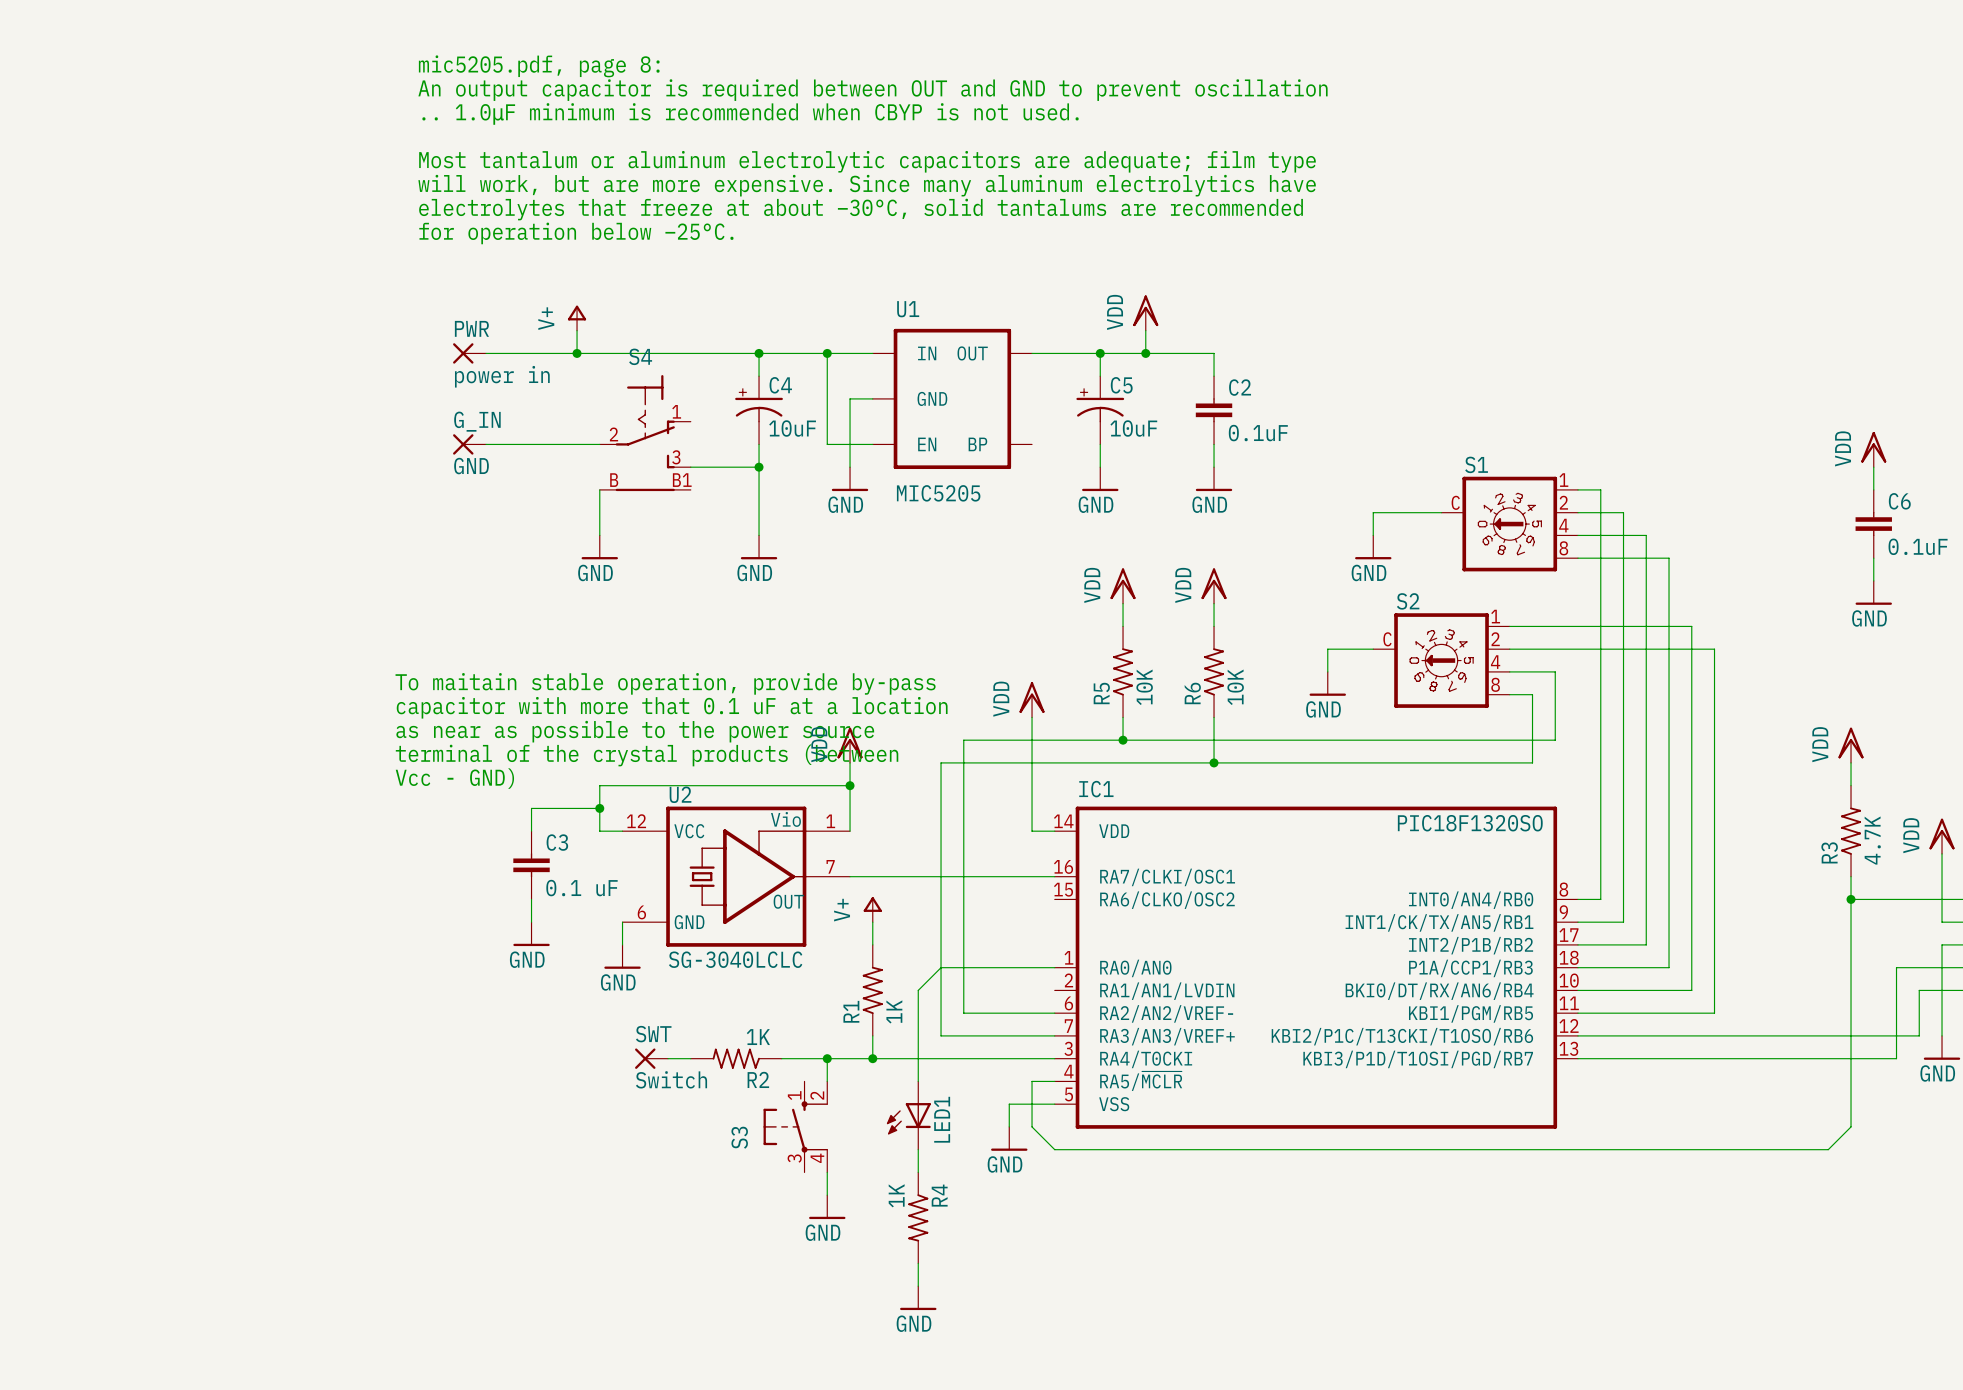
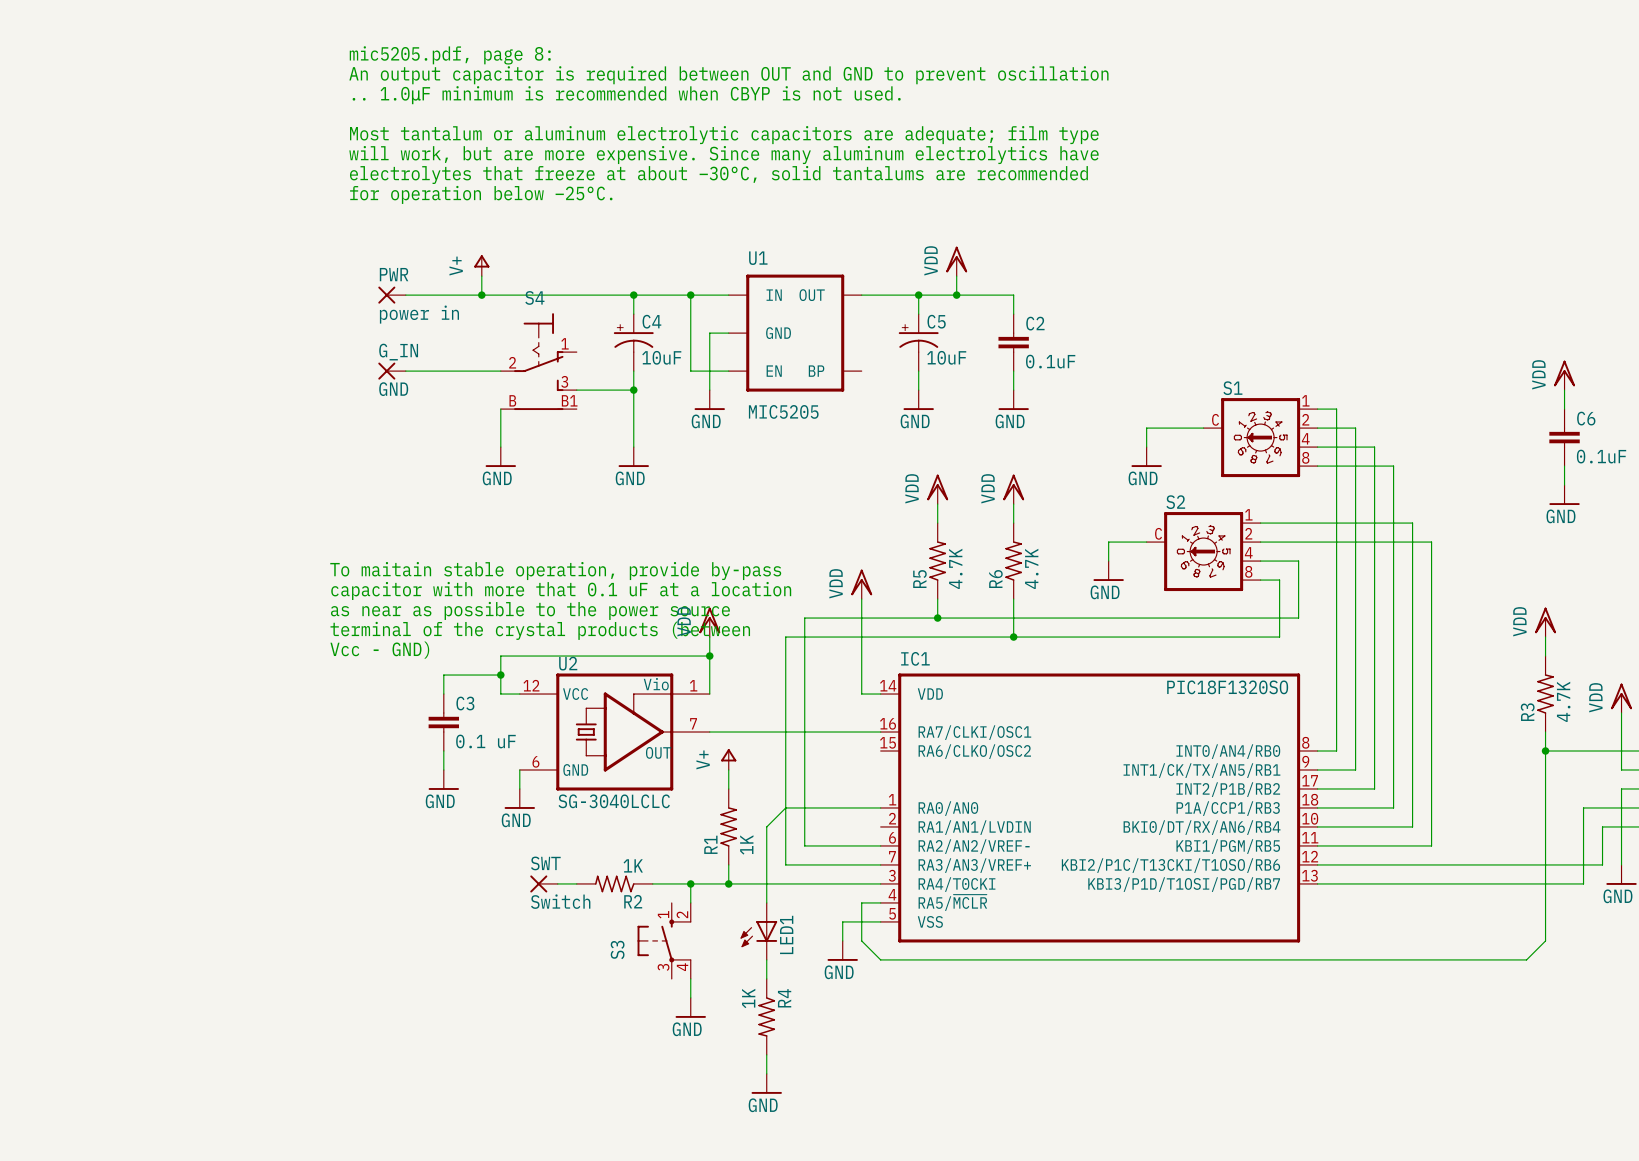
R5 value: 10K (1144, 687) -> 4.7K (955, 568)
R6 value: 10K (1235, 687) -> 4.7K (1031, 568)

